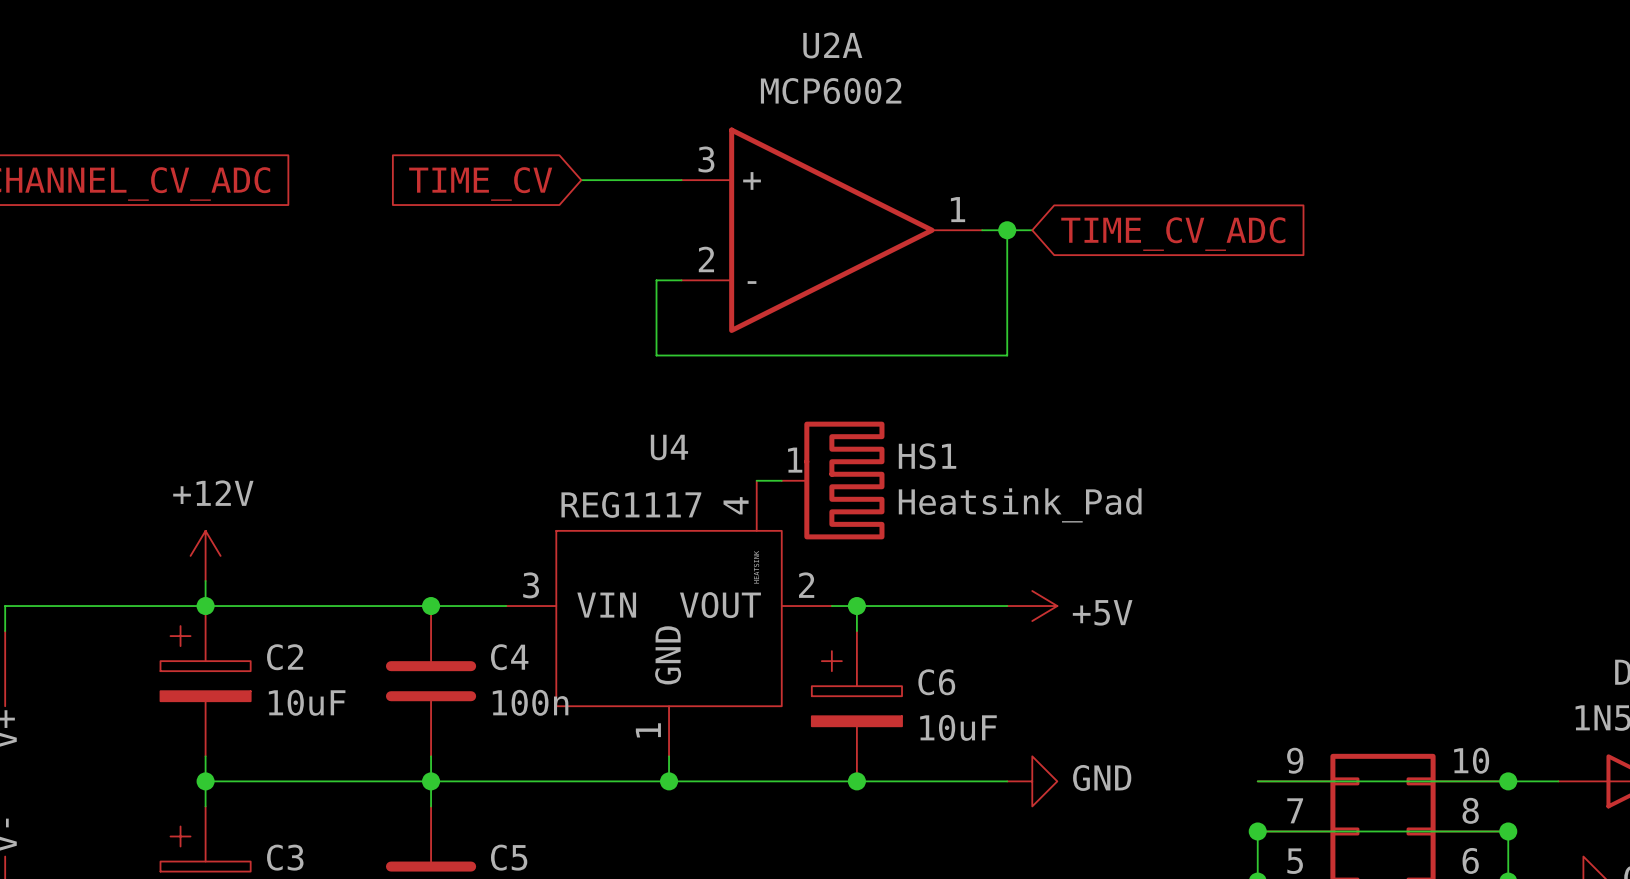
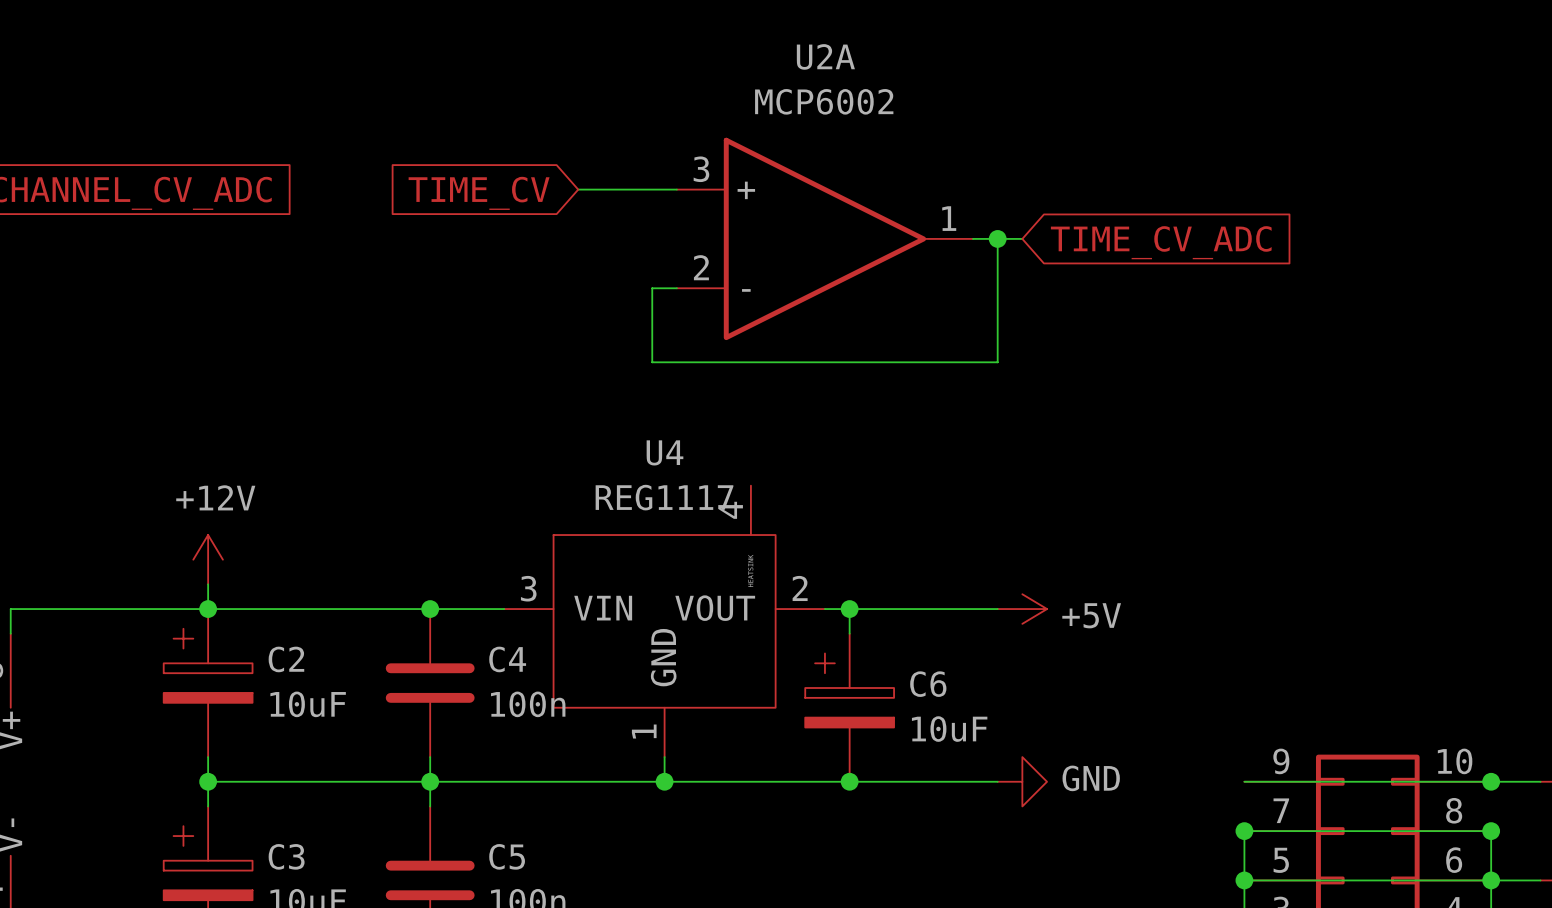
wire: (756, 480) (781, 480) -> none
HS1: Heatsink_Pad (833, 480) -> none
U4 value position: REG1117 (631, 504) -> REG1117 (664, 497)

